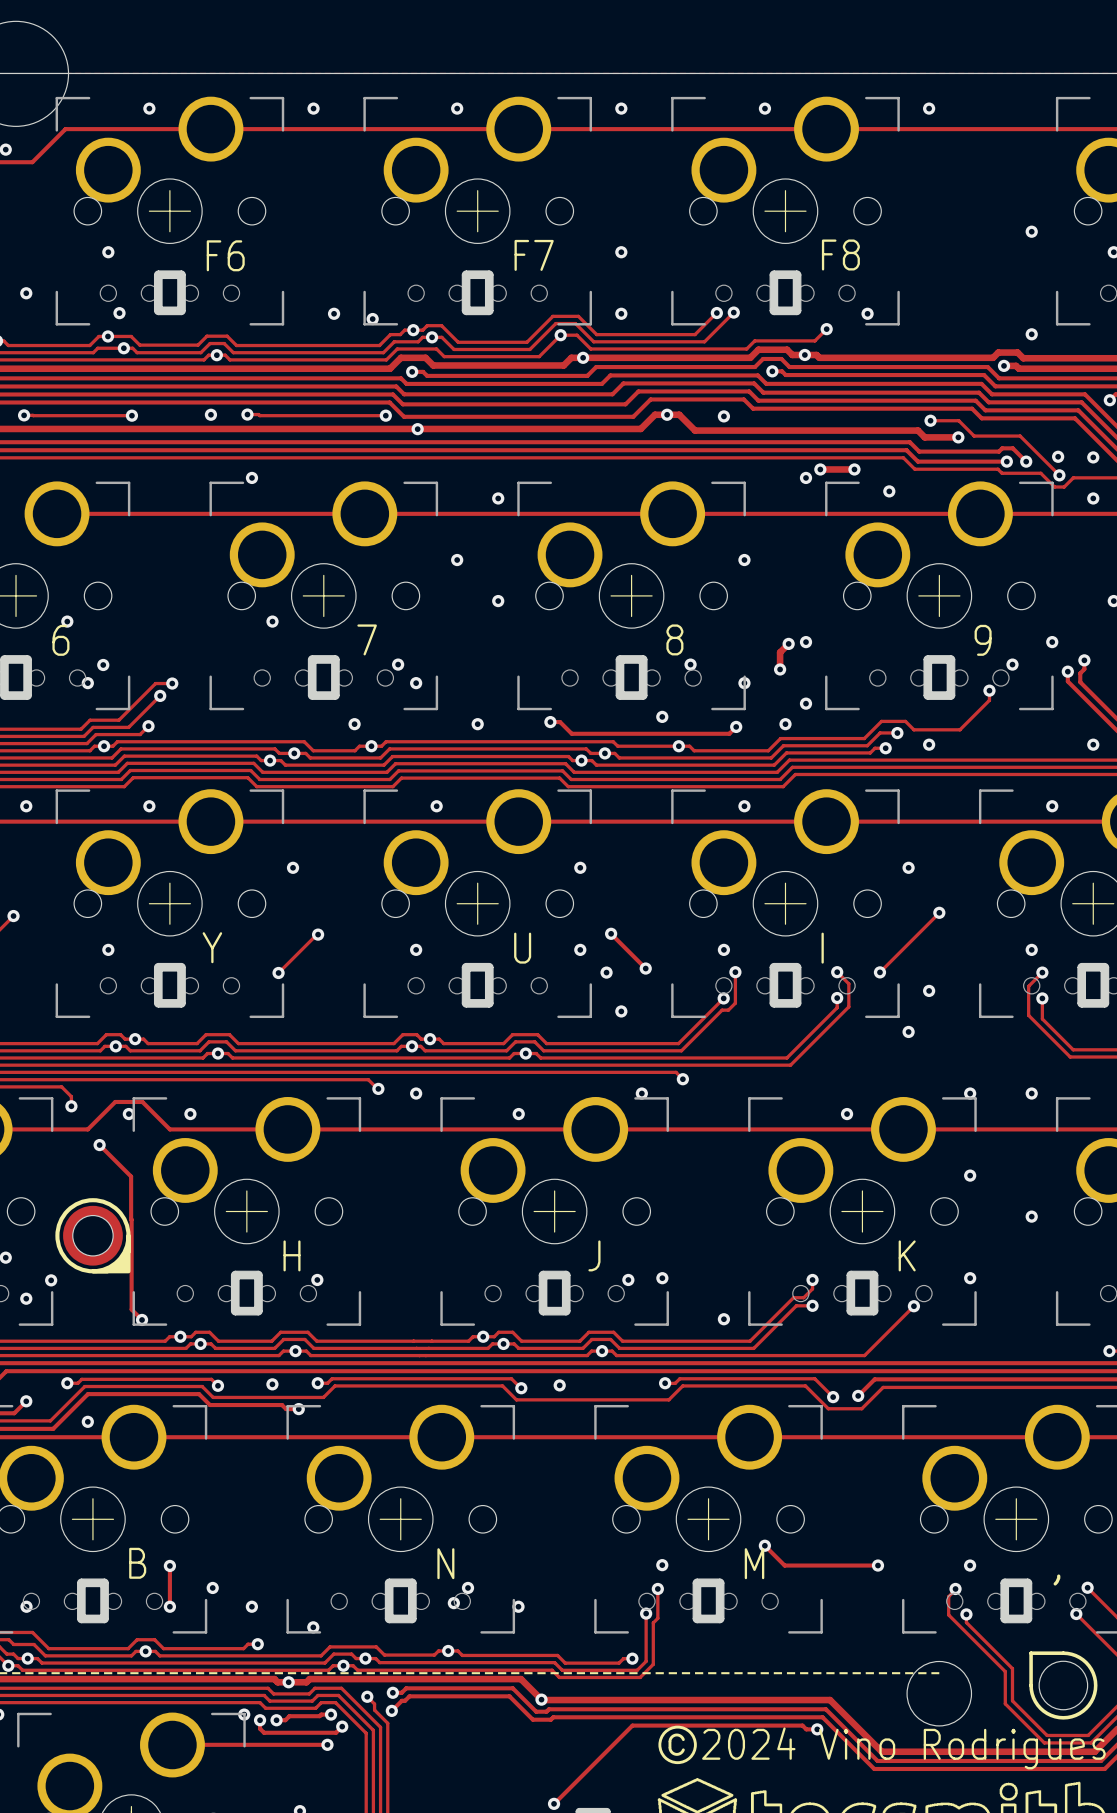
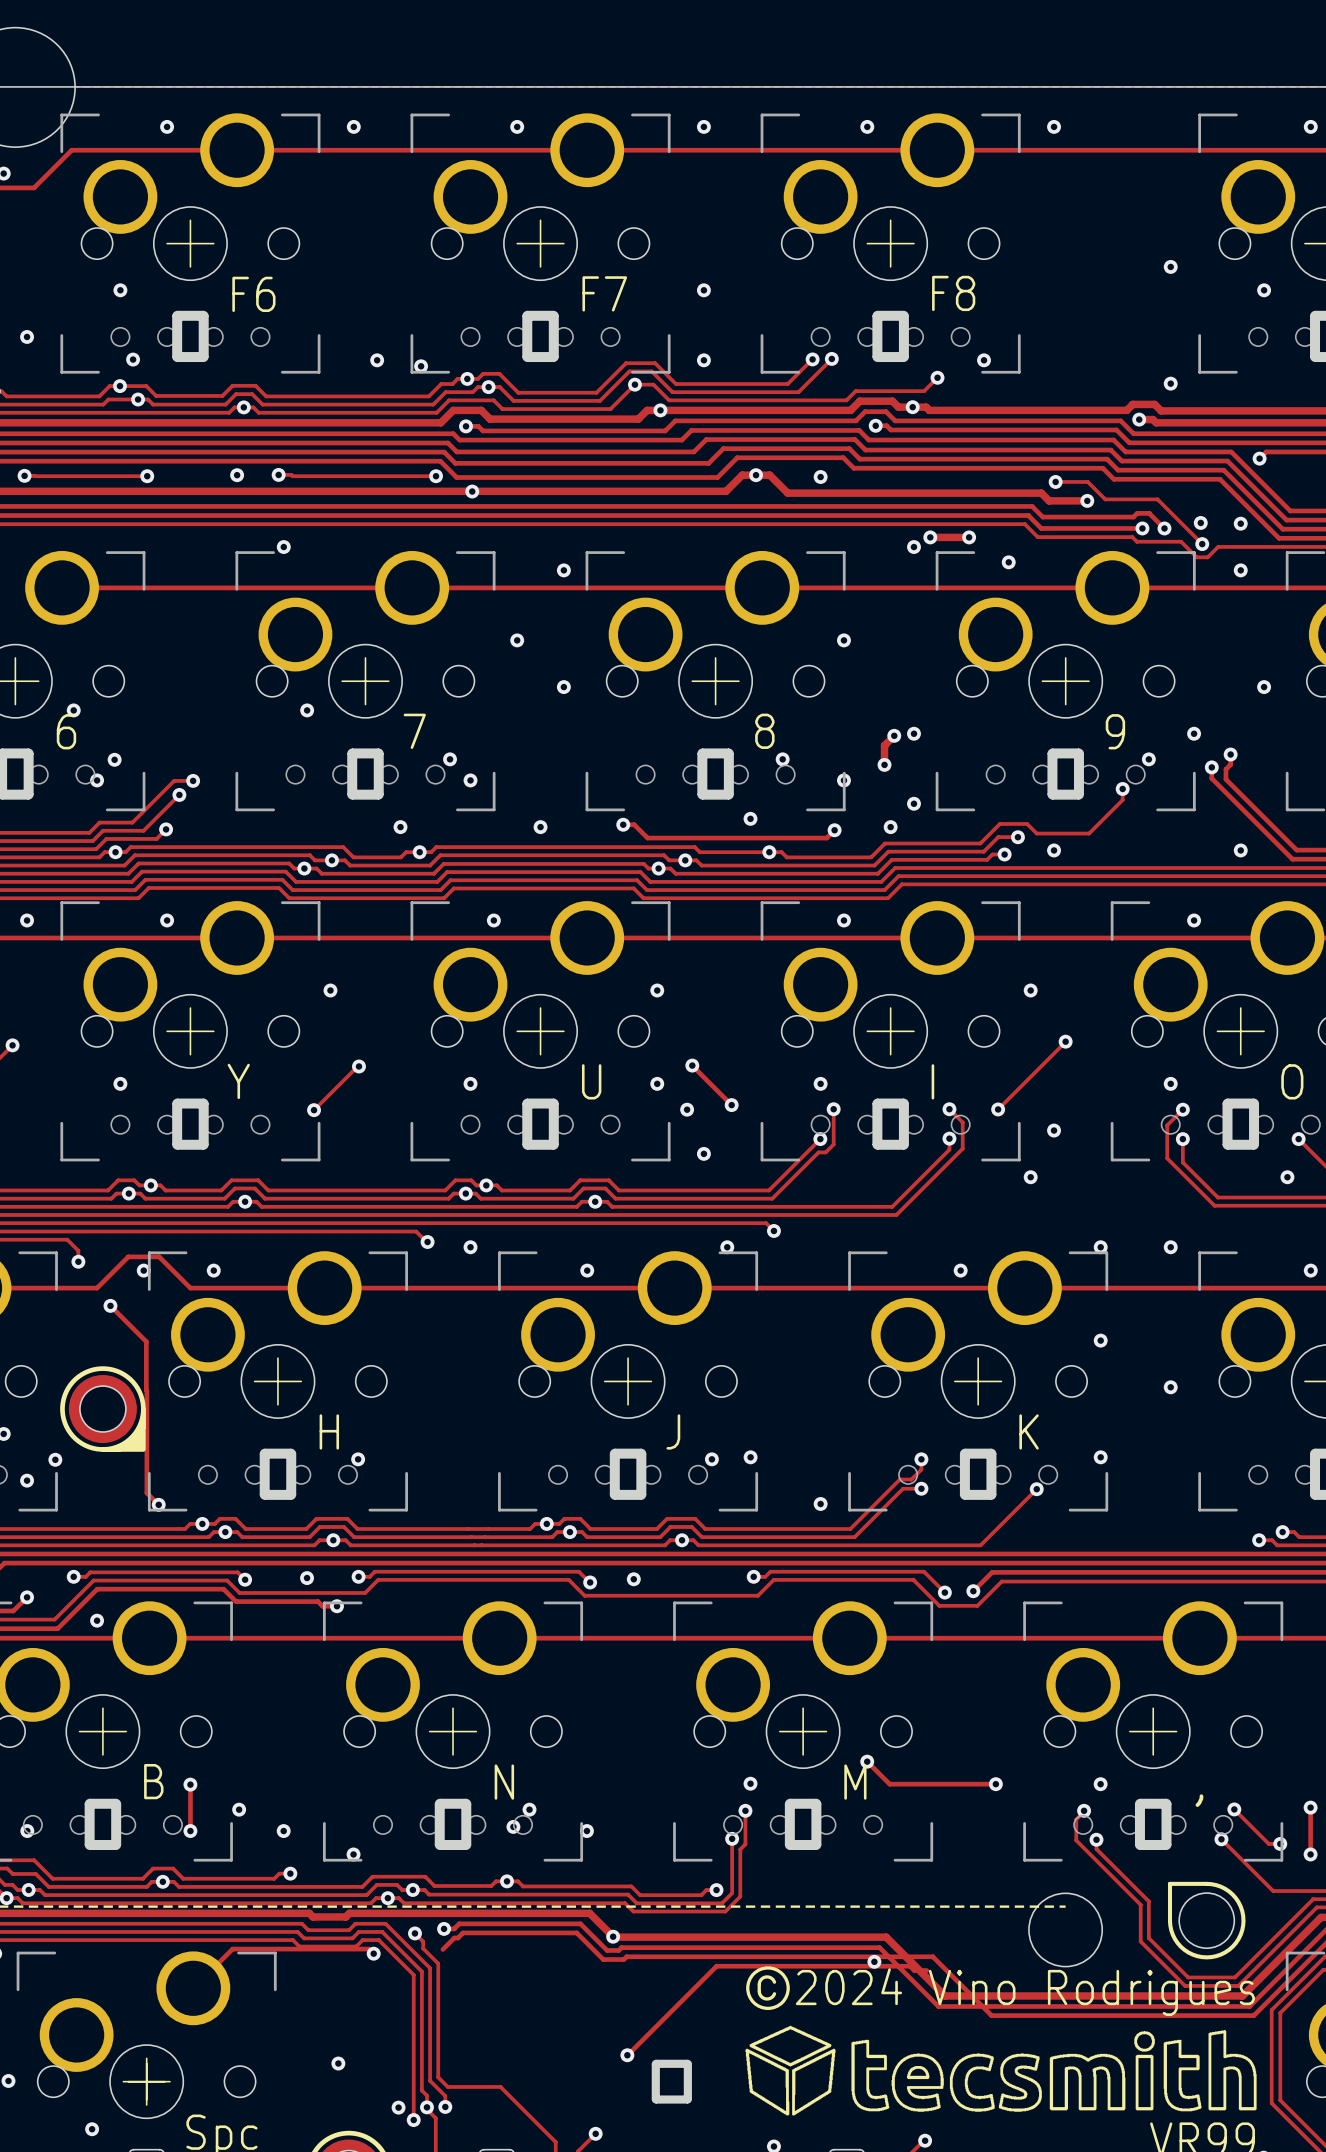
via: (288, 1682) -> none
track: (781, 1700) (830, 1700) (881, 1751) -> (886, 1937) (945, 1995) (1000, 1995)
track: (775, 1709) (825, 1709) (877, 1760) -> (879, 1947) (938, 2006) (995, 2006)
via: (391, 1710) -> none
via: (244, 1714) -> none
track: (331, 1714) (289, 1716) (285, 1720) (276, 1720) -> none
track: (260, 1720) (260, 1728) (264, 1732) (336, 1732) (342, 1726) -> none
via: (260, 1720) -> none
via: (276, 1720) -> none
via: (342, 1726) -> none
via position: (817, 1729) -> (874, 1961)
track: (172, 1744) (327, 1744) -> (193, 1988) (232, 1949) (369, 1949) (373, 1953)
via: (327, 1744) -> none

